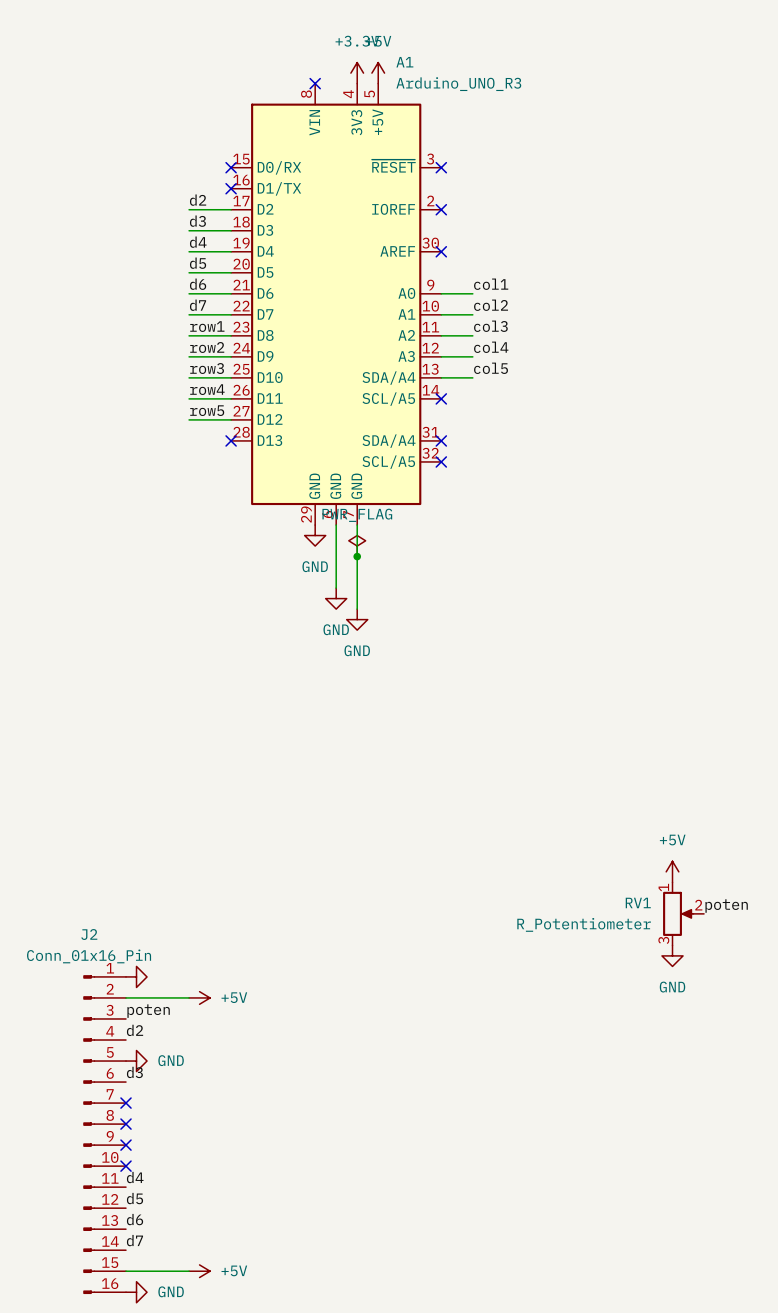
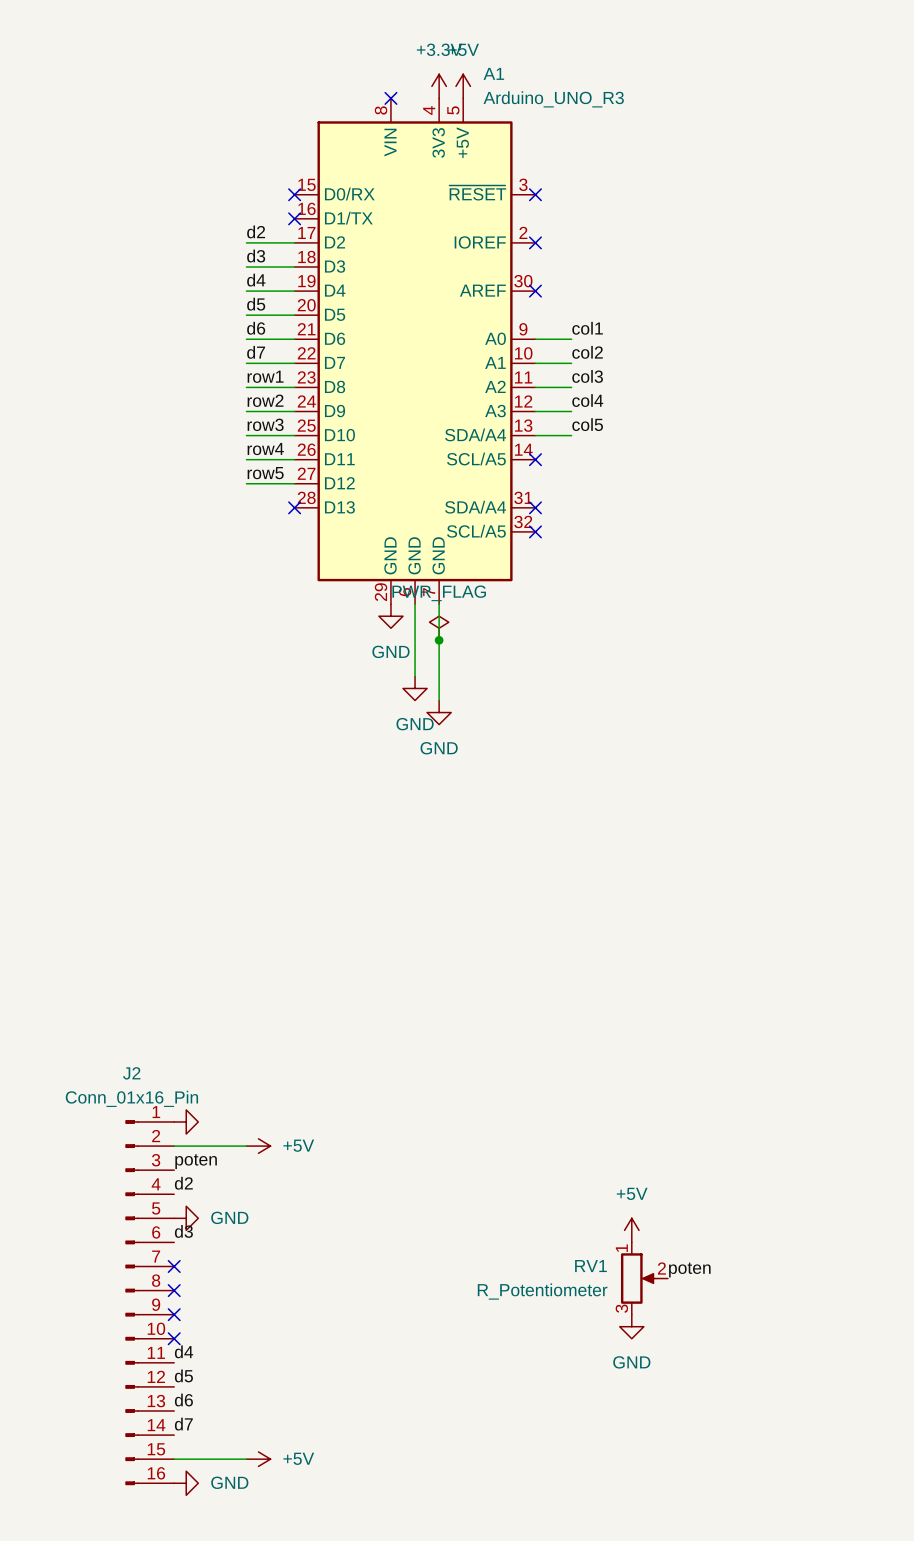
power symbol: +5V (672, 871) -> none
label: poten (726, 906) -> none
RV1 position: (683, 913) -> (644, 1278)
power symbol: GND (672, 955) -> none
power symbol: none -> +5V (631, 1230)
label: none -> poten (689, 1269)
power symbol: none -> GND (631, 1326)

